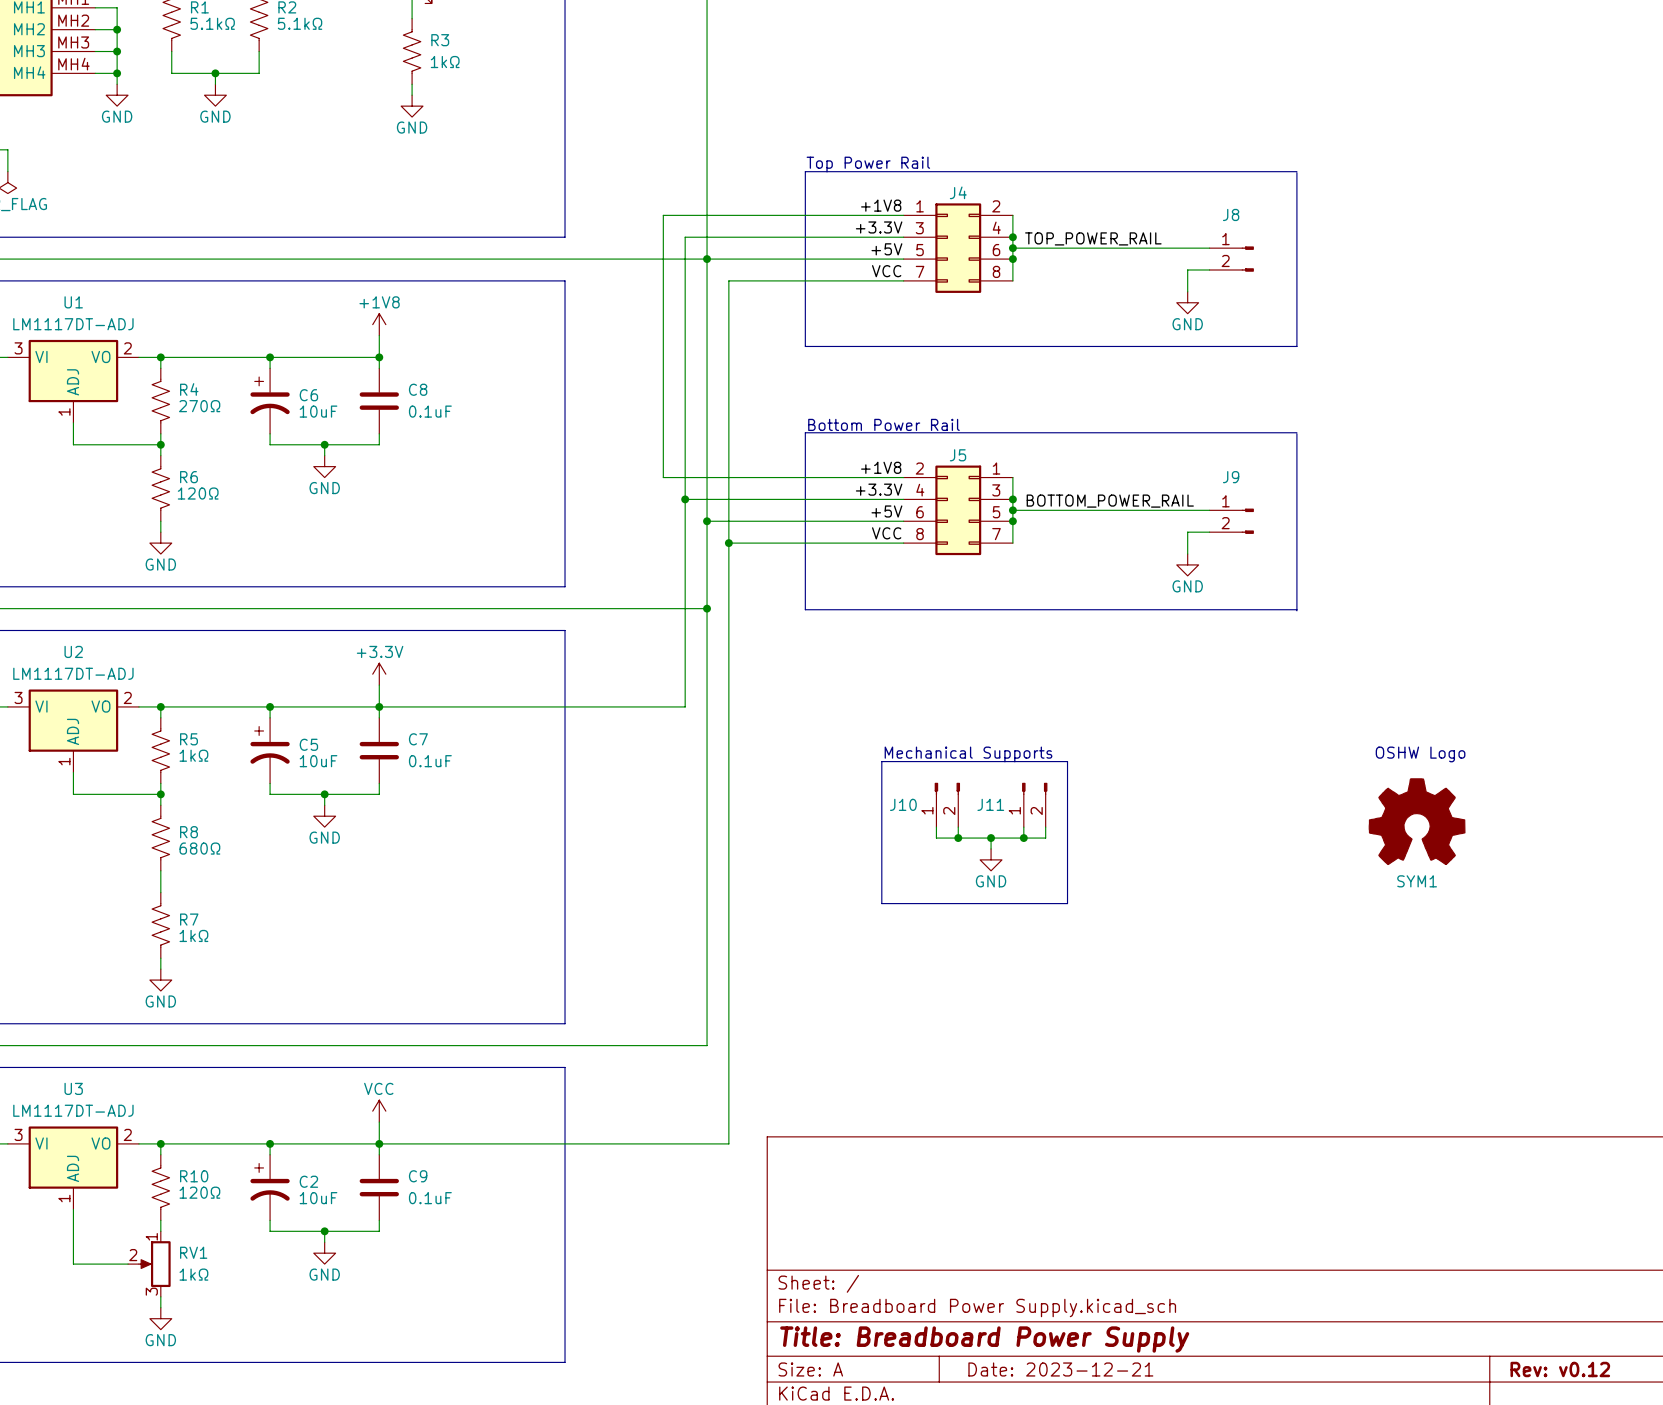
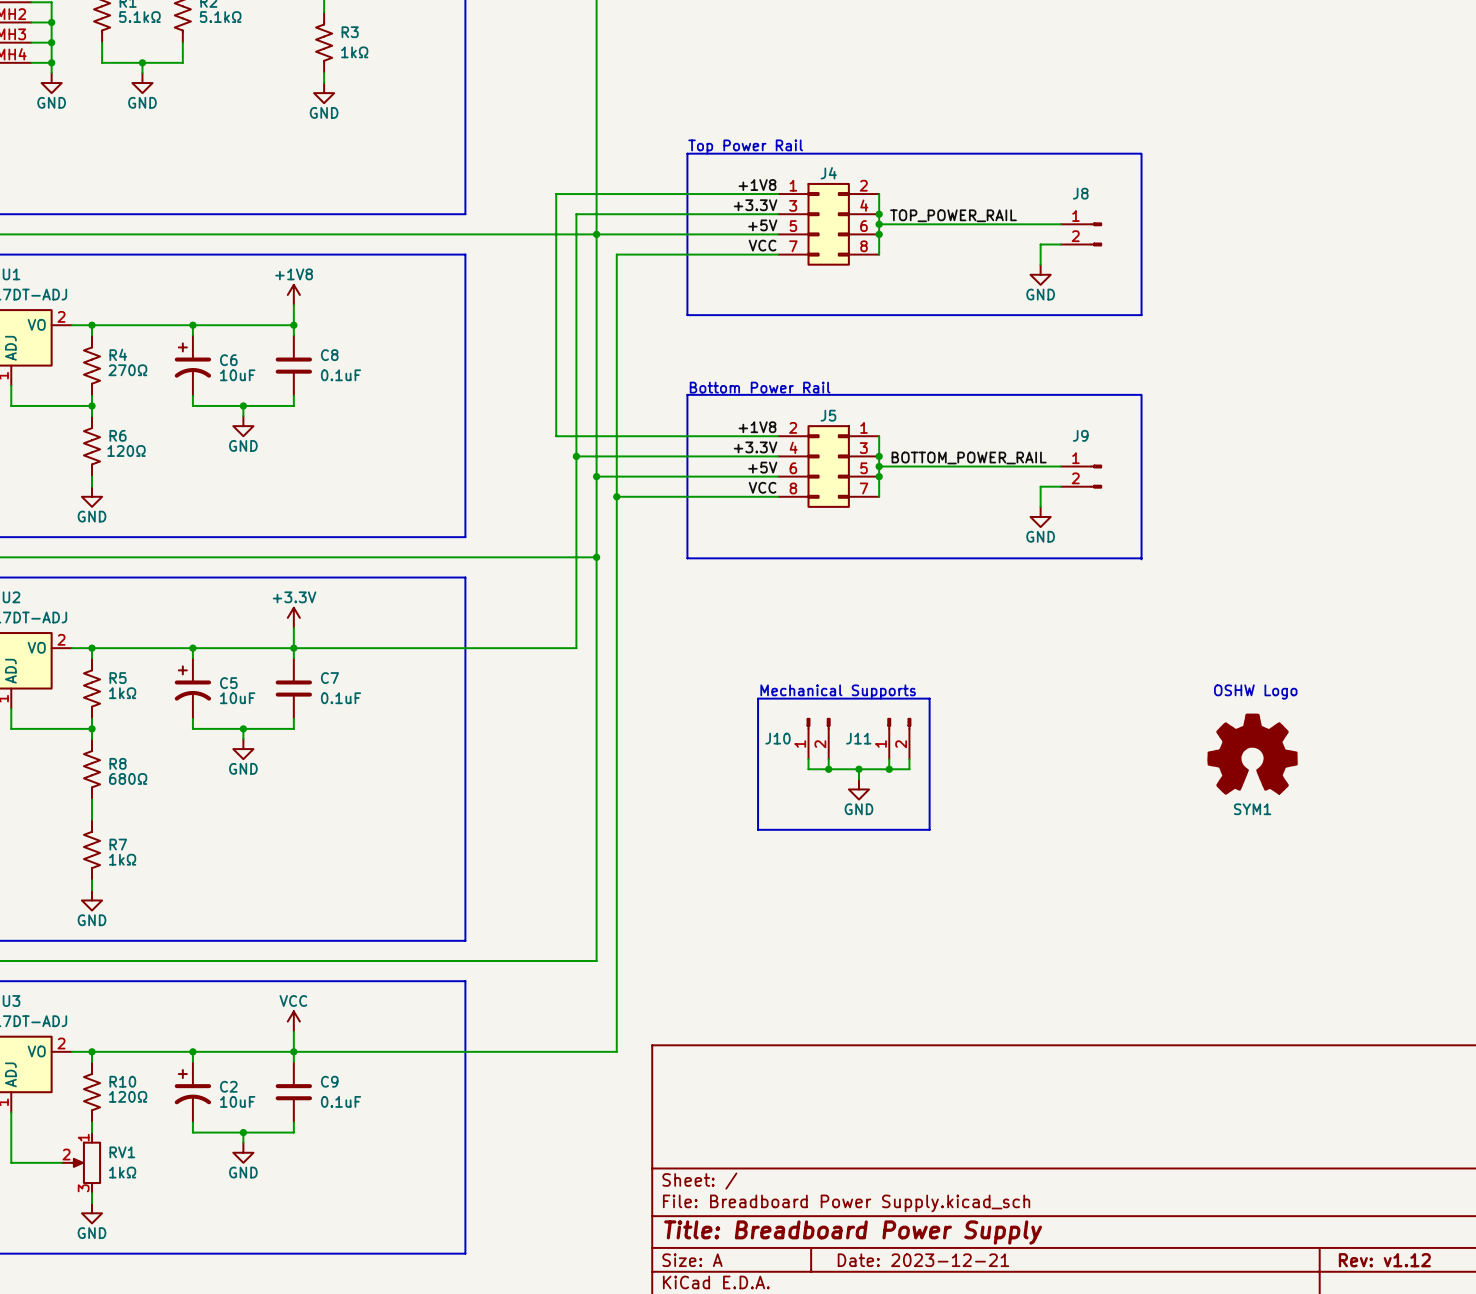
title block: Rev: v0.12 (1560, 1369) -> Rev: v1.12 (1384, 1260)

